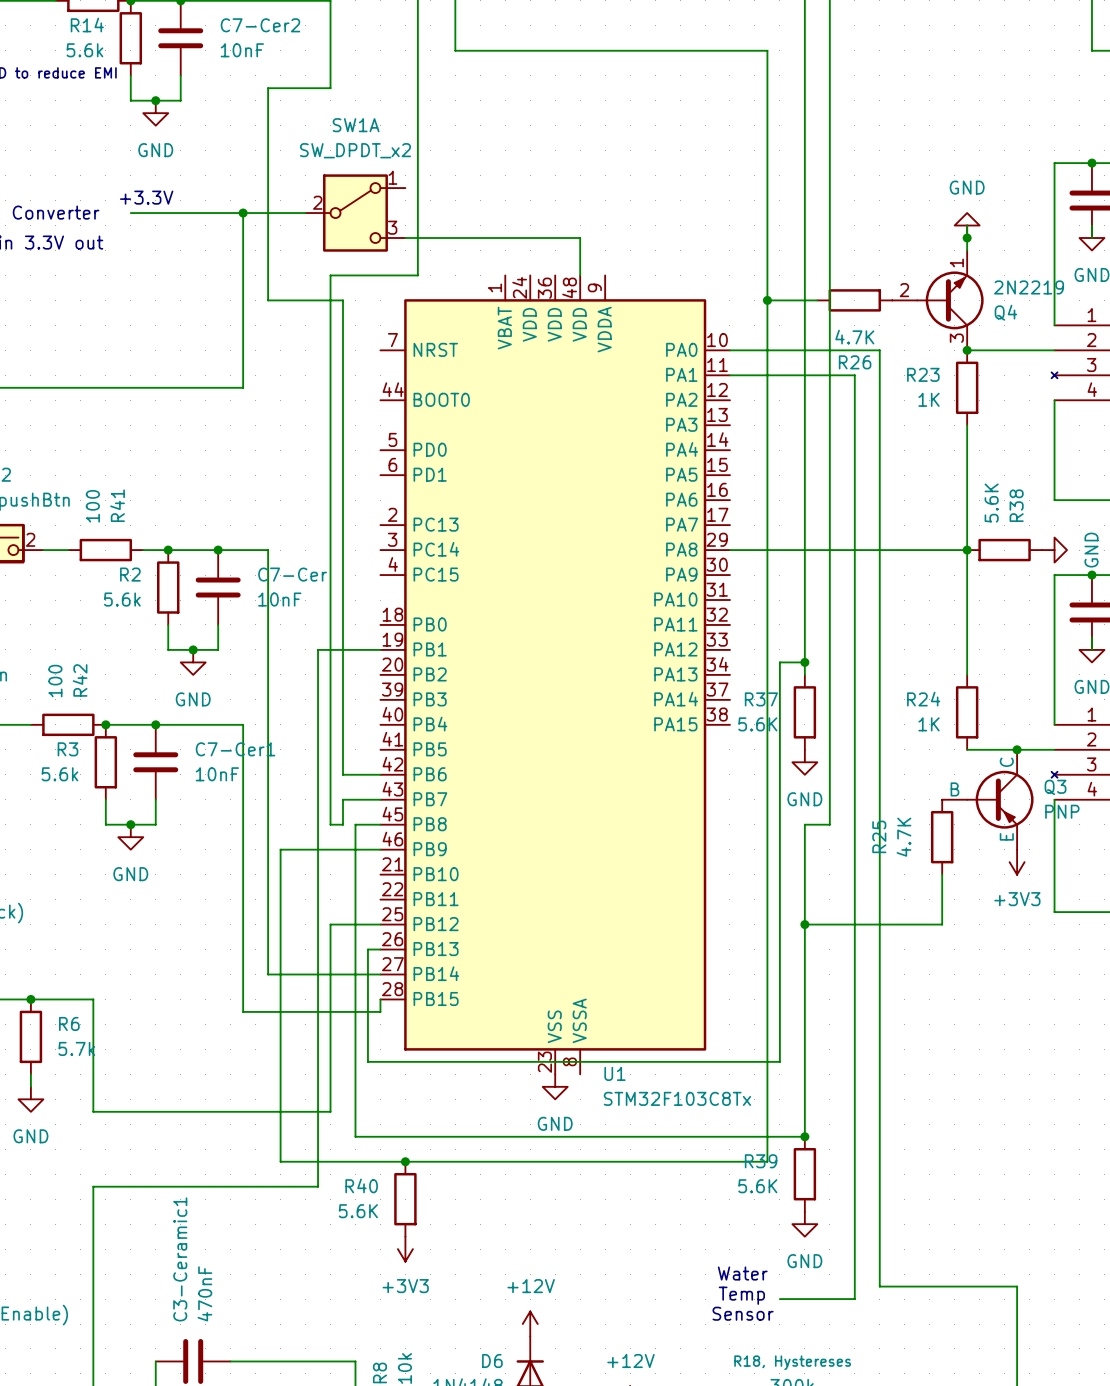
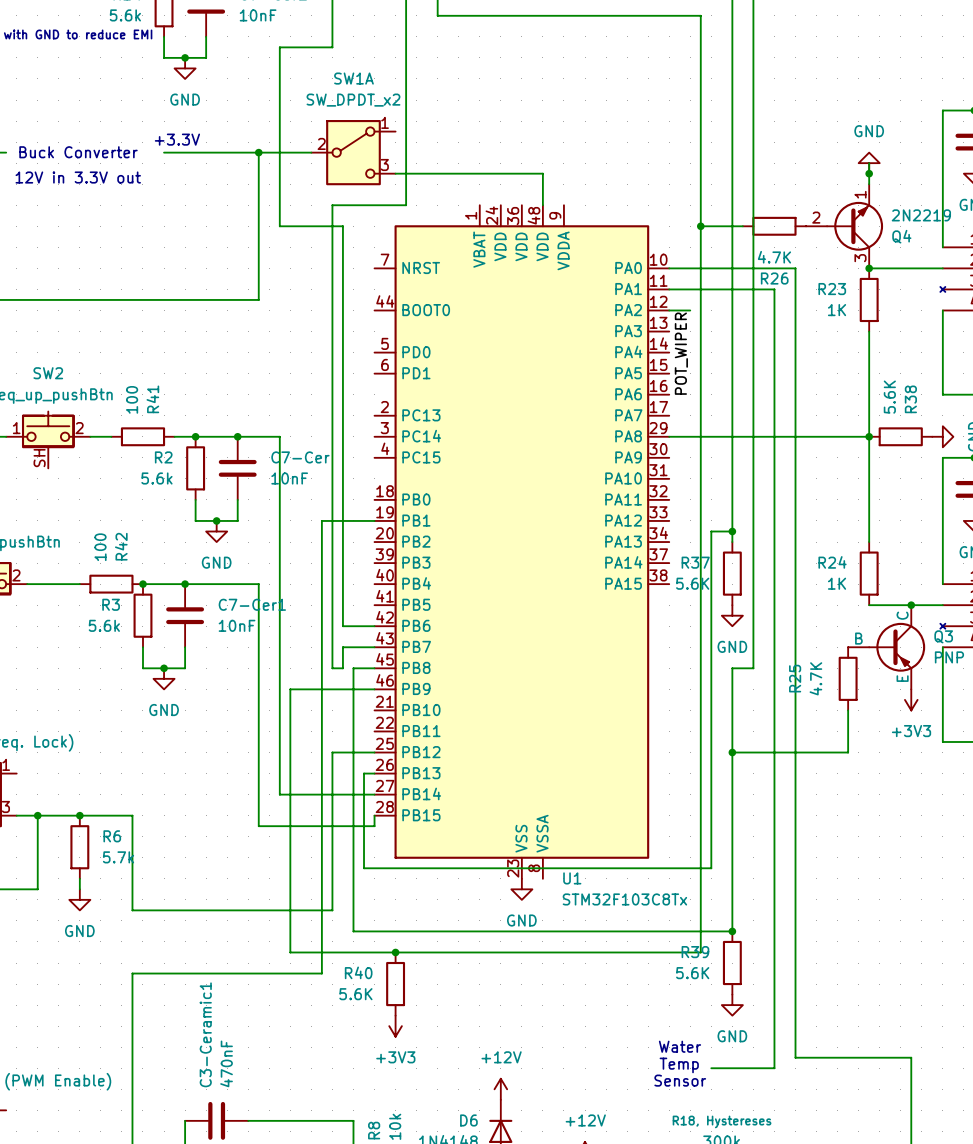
wire: none -> (669, 310) (690, 310)
label: none -> POT_WIPER (681, 353)

